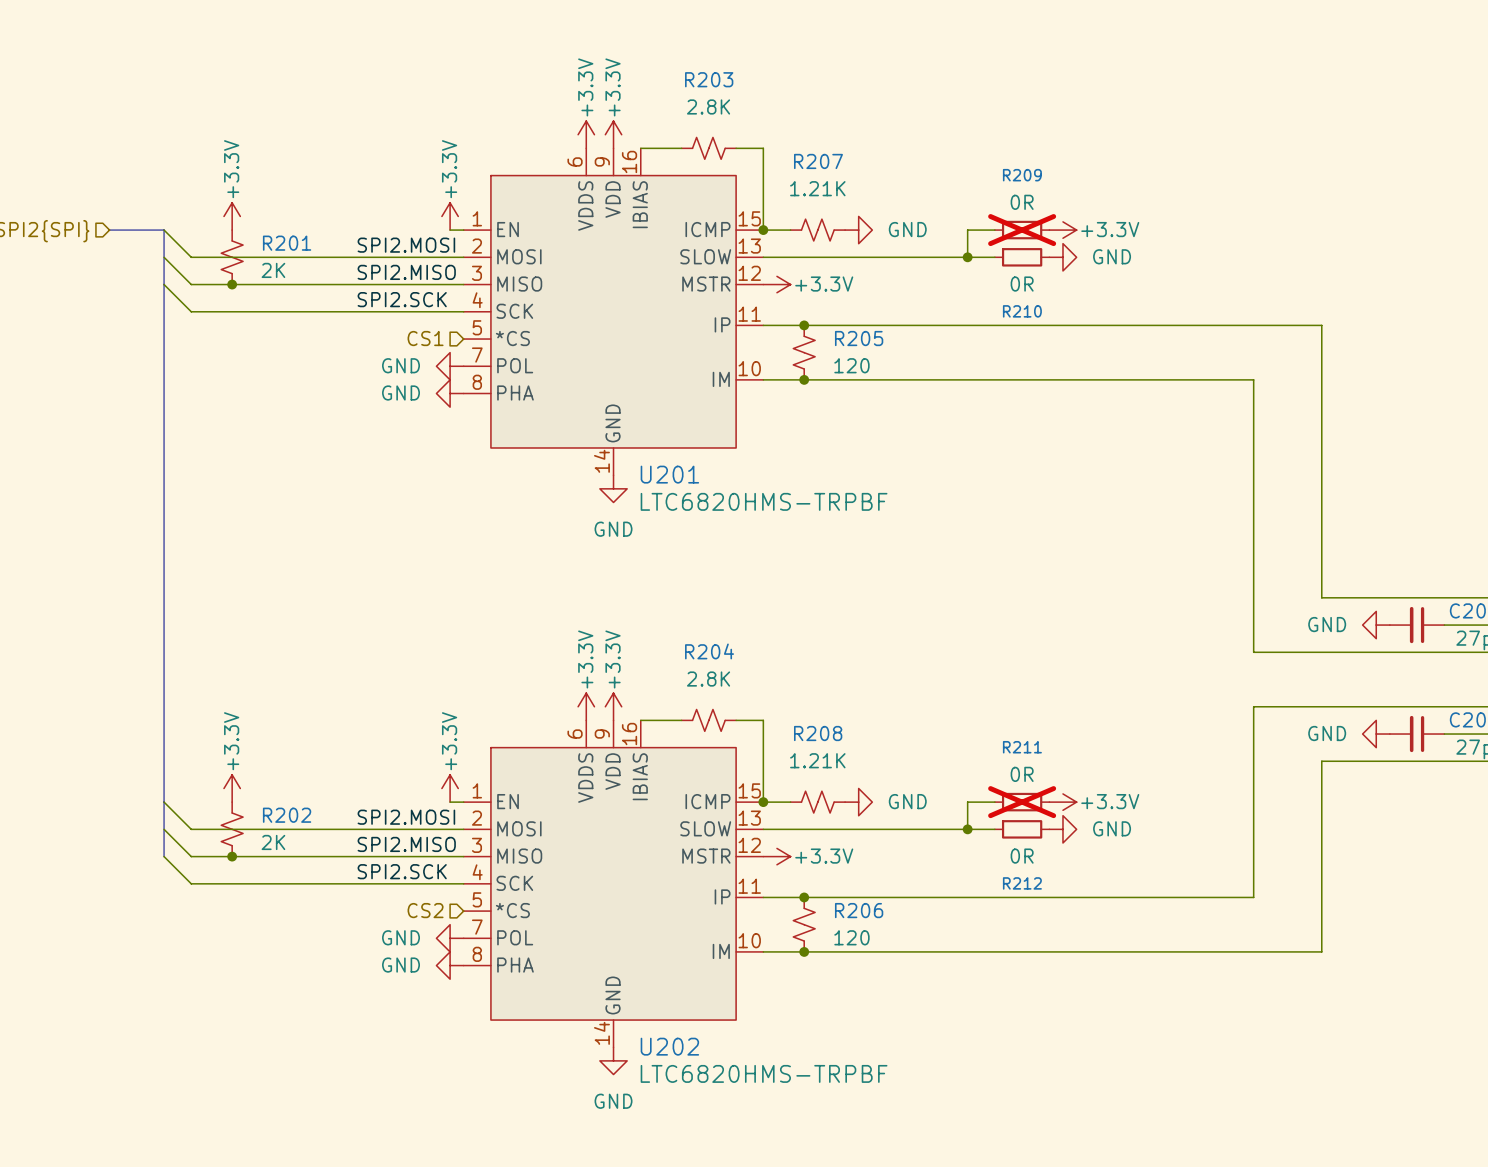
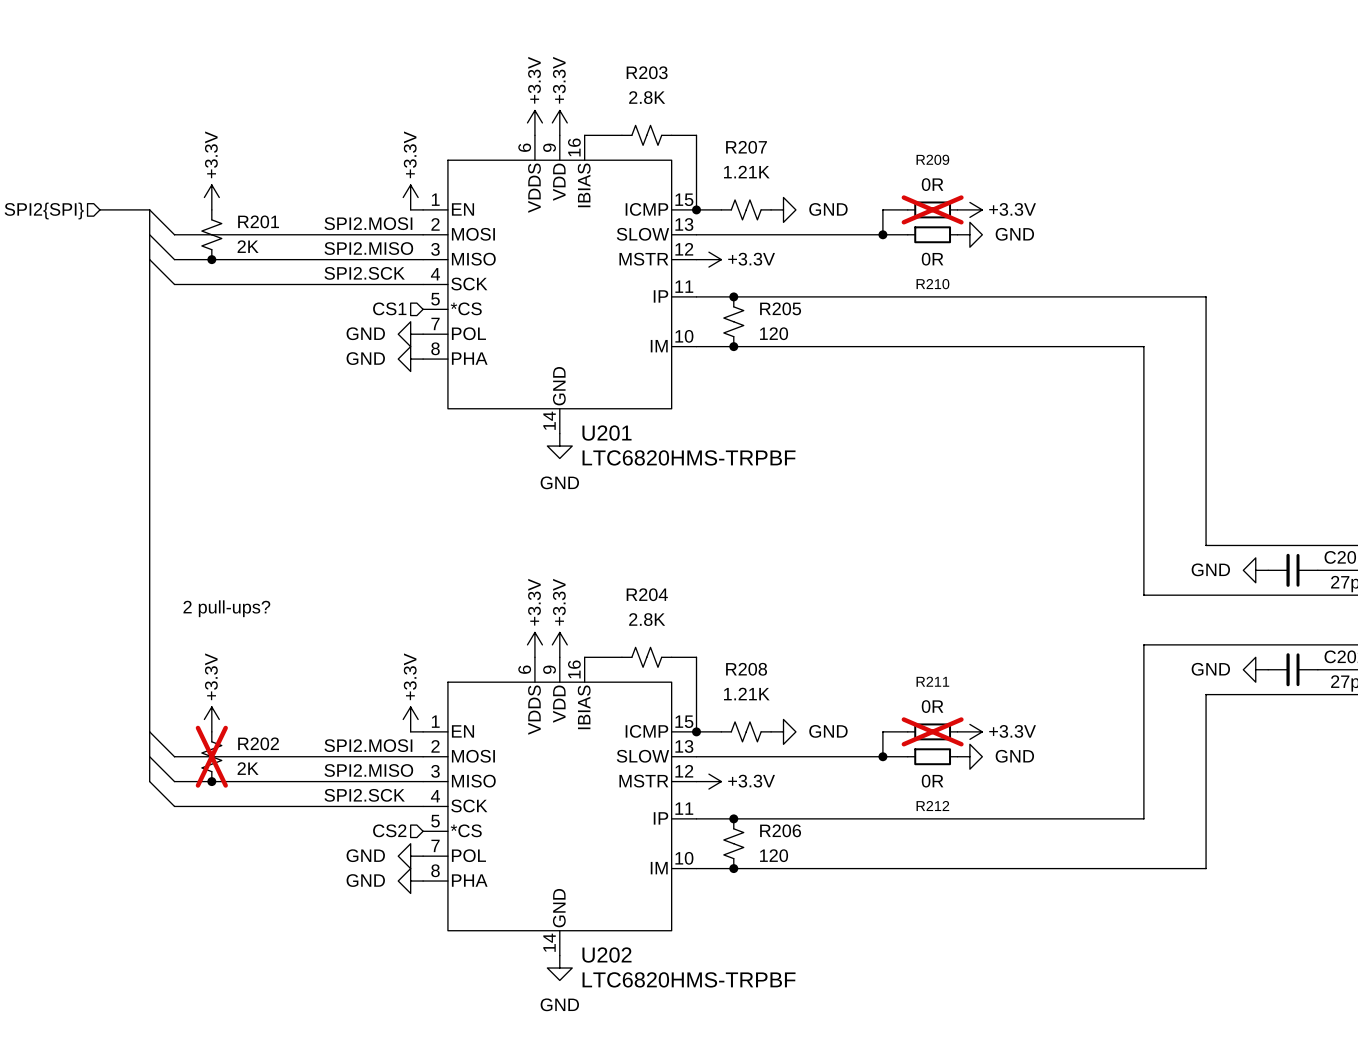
text: none -> 2 pull-ups? (226, 608)
R202 do-not-place cross: none -> (211, 756)

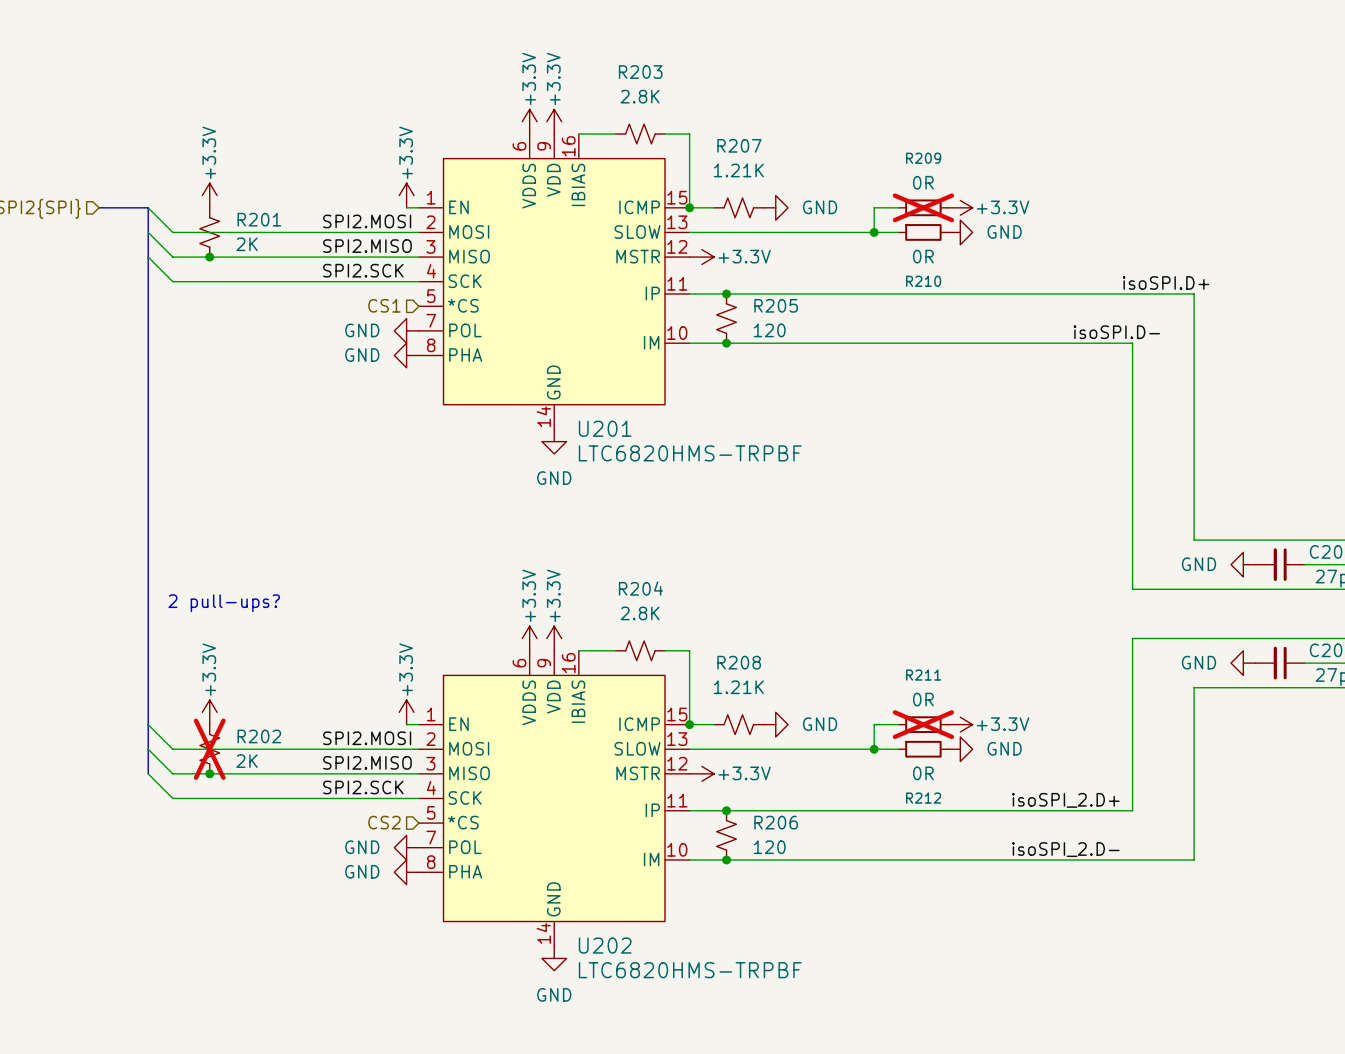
label: none -> isoSPI.D+ (1166, 282)
label: none -> isoSPI.D- (1116, 332)
label: none -> isoSPI_2.D+ (1065, 800)
label: none -> isoSPI_2.D- (1065, 849)

